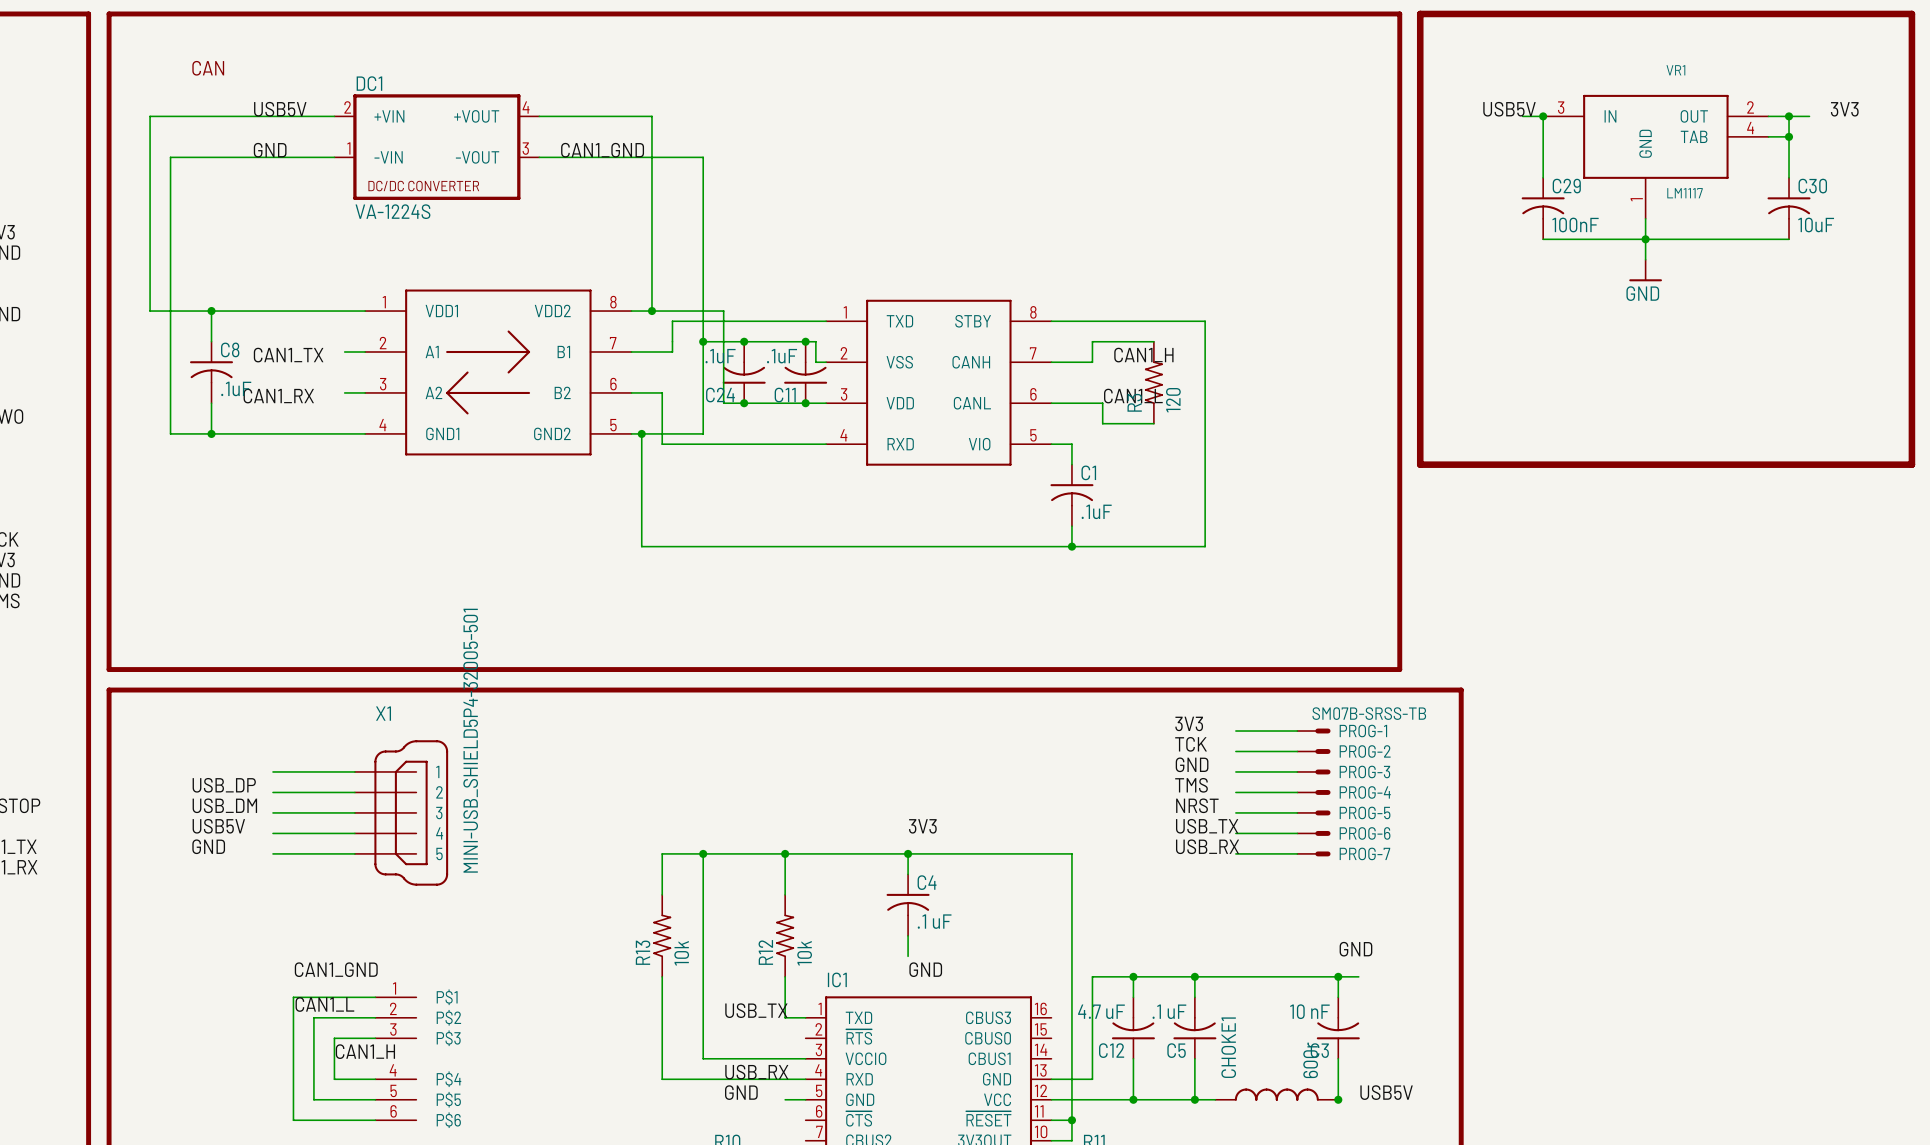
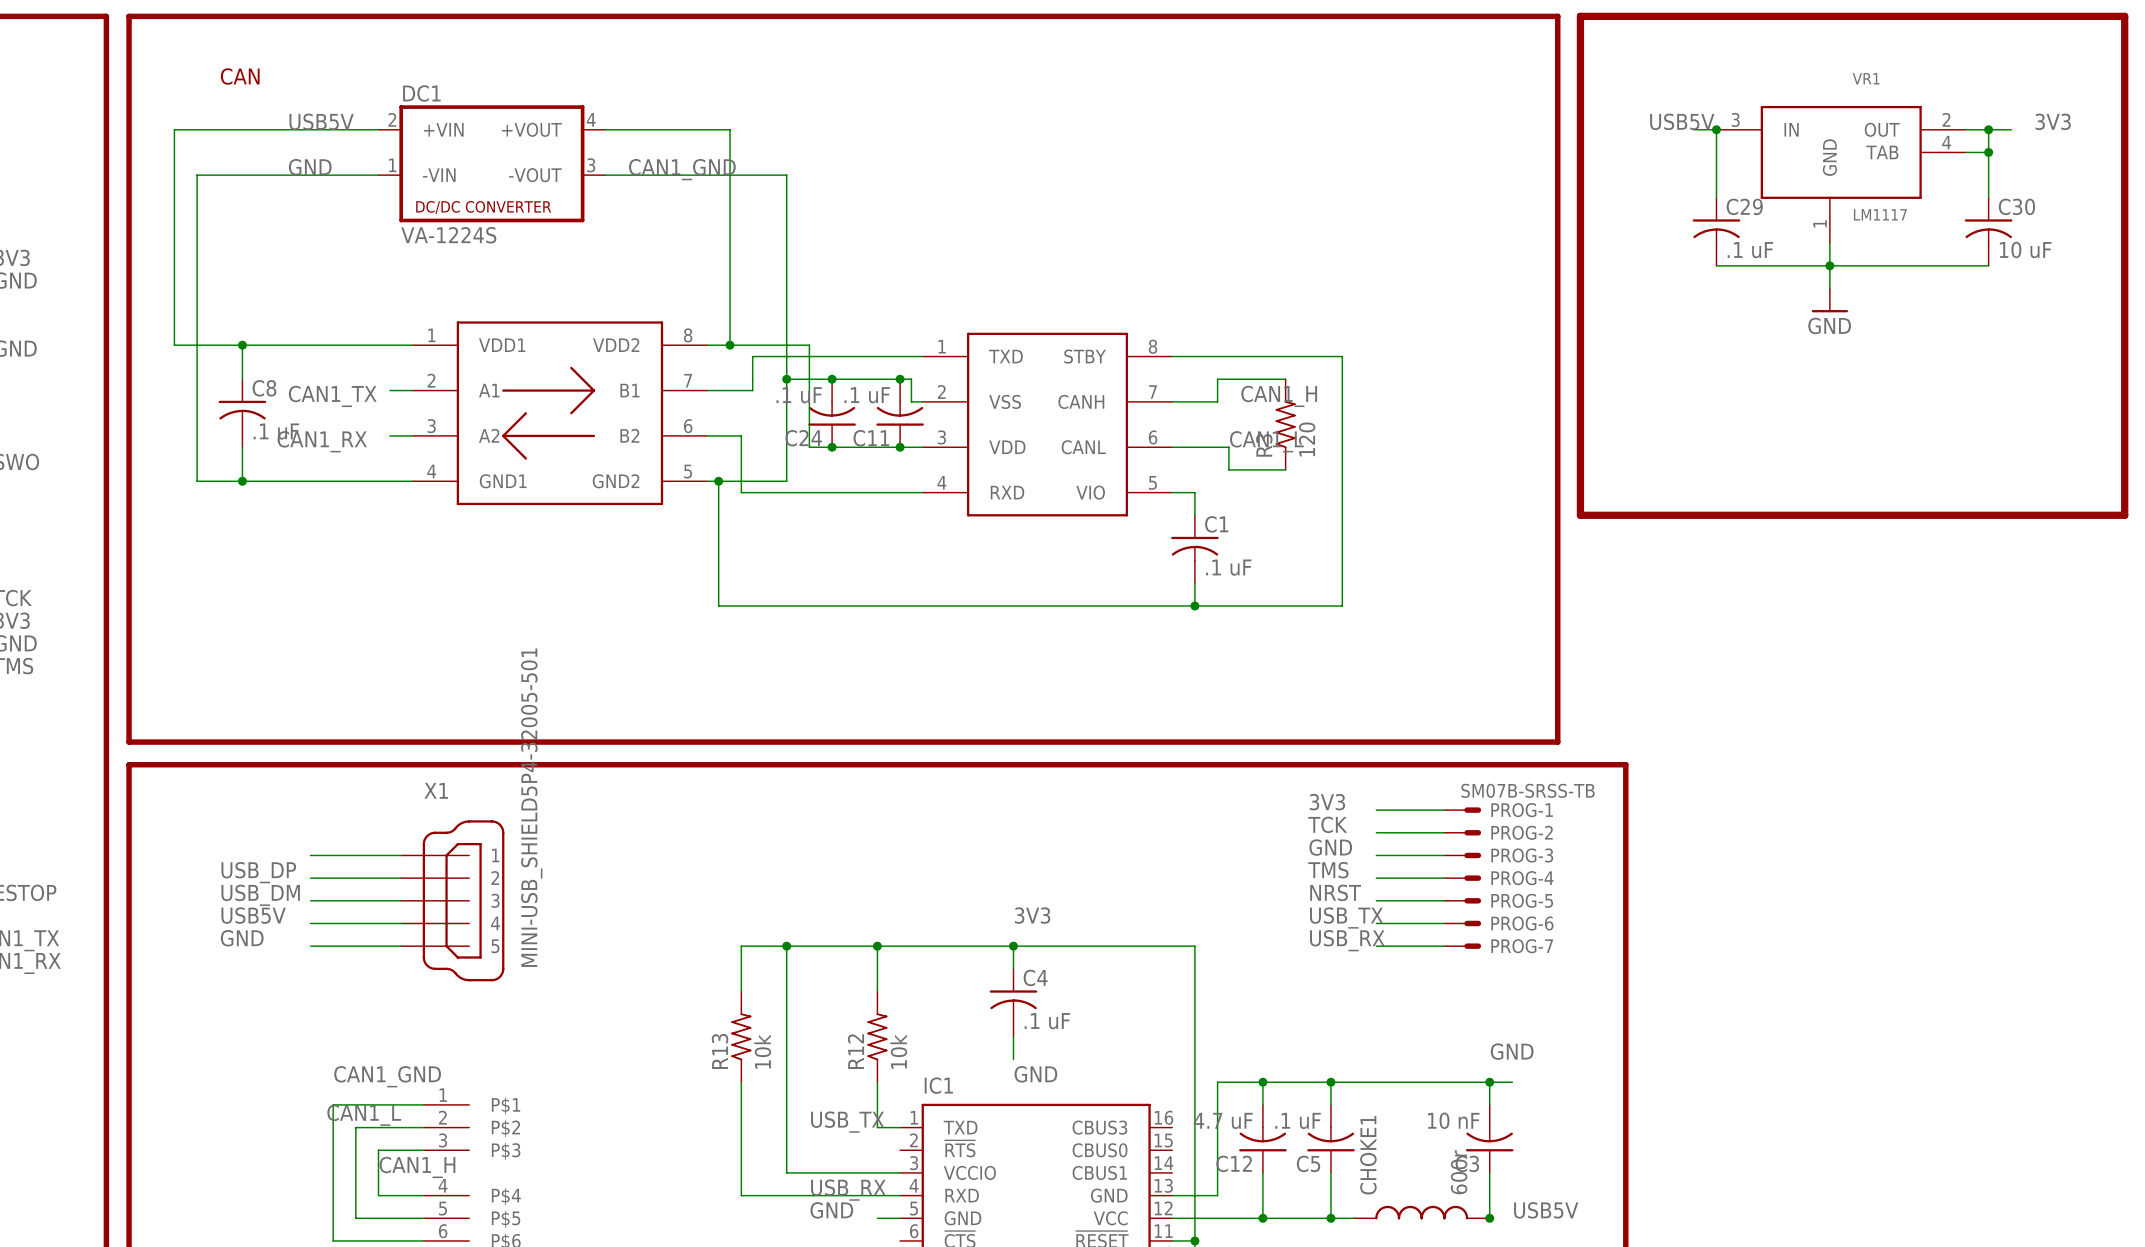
C29 value: 100nF (1575, 224) -> .1 uF (1750, 250)
C30 value: 10uF (1816, 224) -> 10 uF (2025, 249)
C24 value: .1uF (720, 356) -> .1 uF (799, 395)
C11 value: .1uF (782, 356) -> .1 uF (867, 395)
C8 value: .1uF (236, 388) -> .1 uF (276, 431)
C1 value: .1uF (1096, 511) -> .1 uF (1228, 567)

